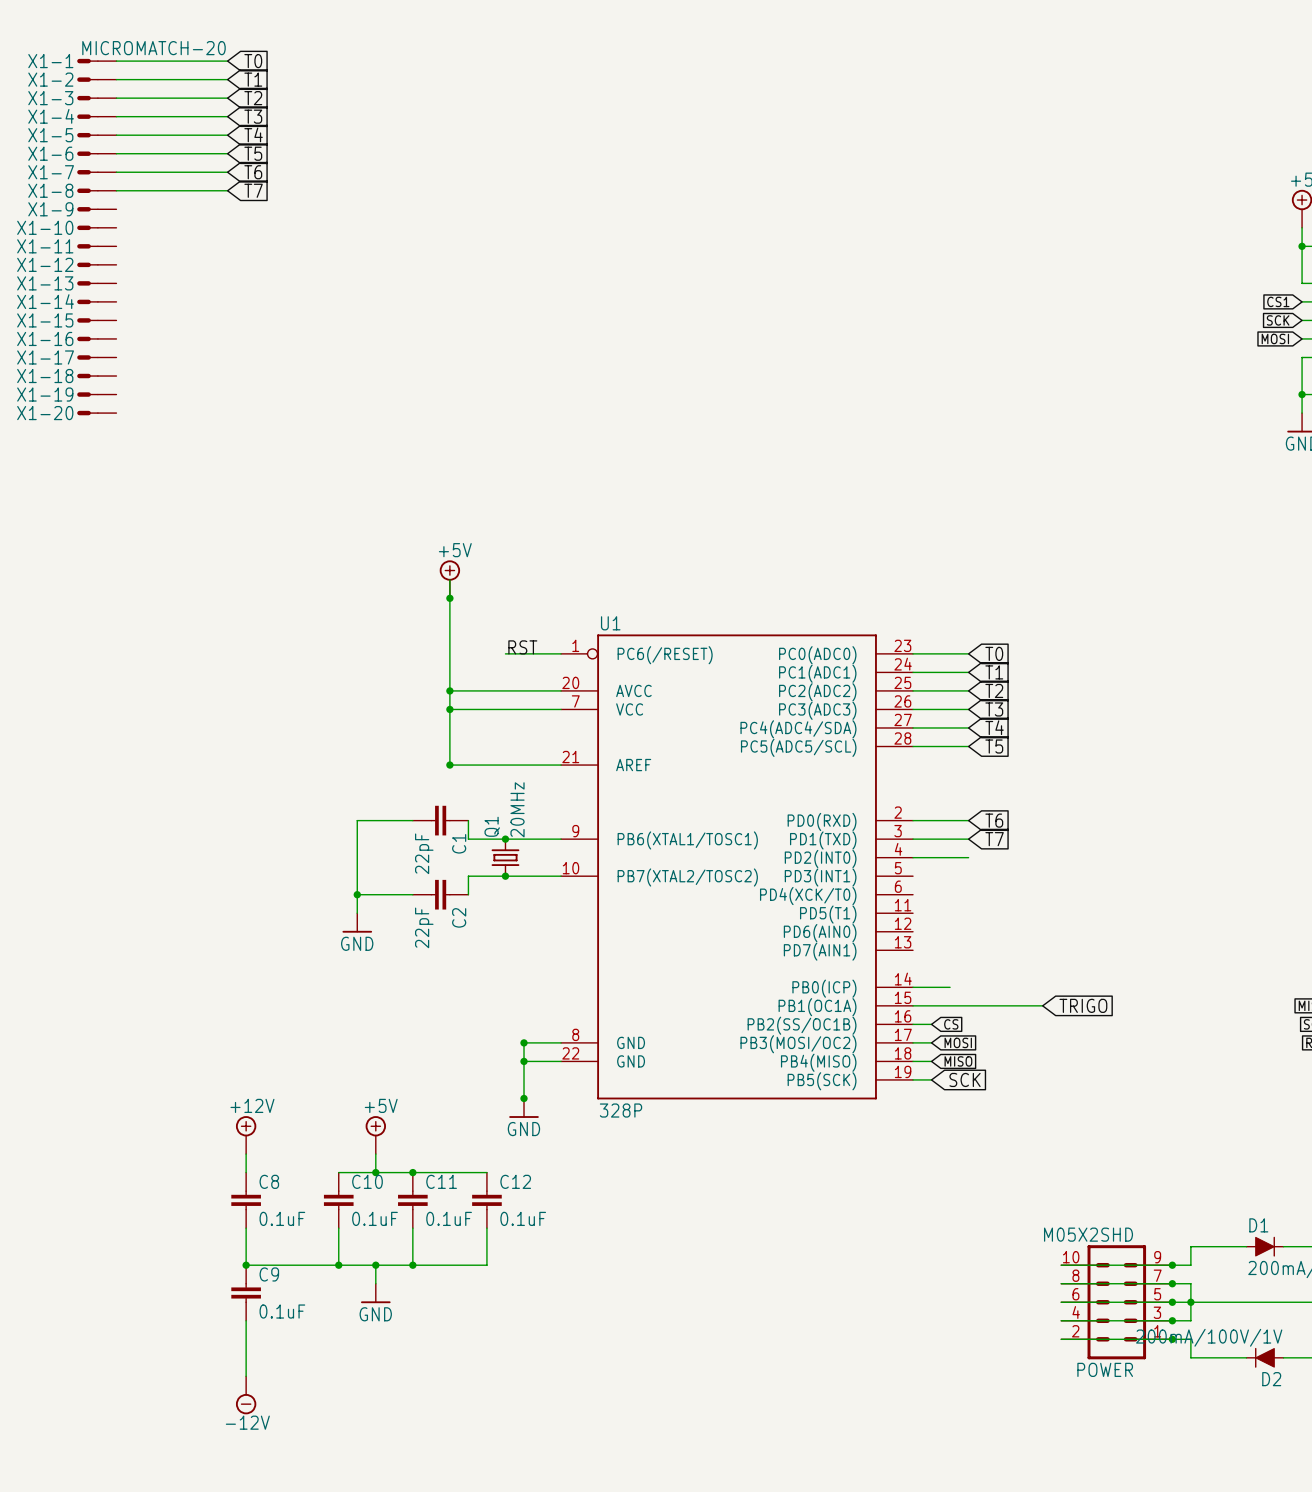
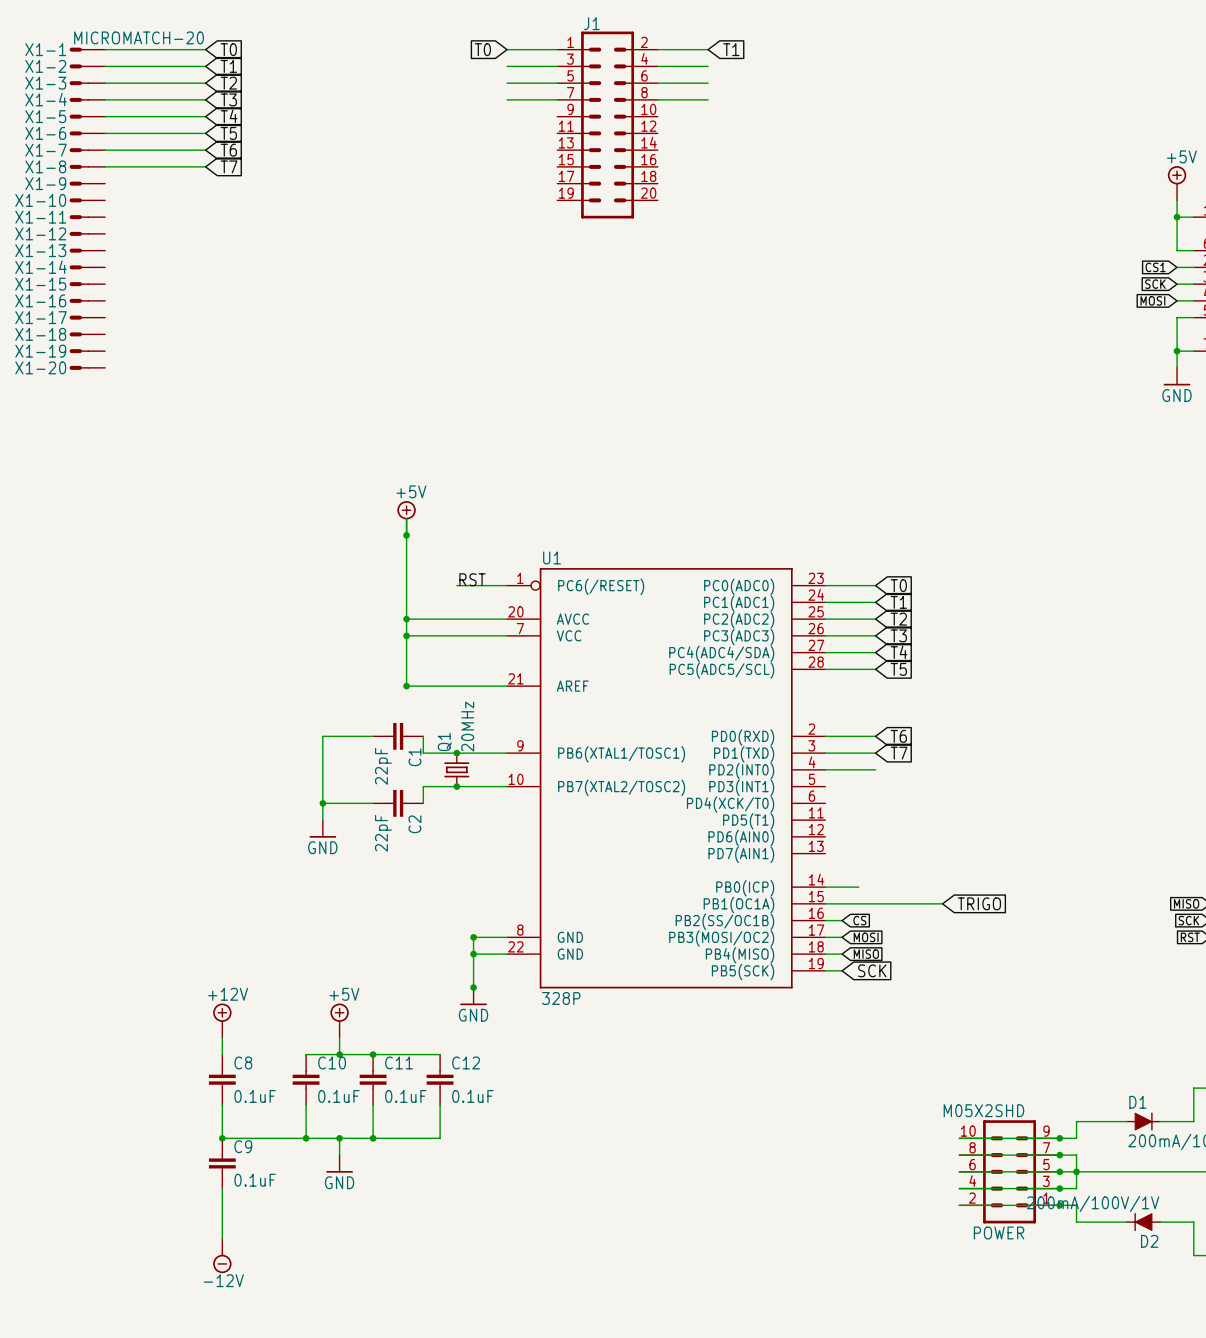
global label: none -> T0 (482, 49)
wire: none -> (507, 49) (557, 49)
wire: none -> (657, 49) (708, 49)
global label: none -> T1 (731, 49)
wire: none -> (507, 66) (557, 66)
wire: none -> (657, 66) (708, 66)
wire: none -> (507, 83) (557, 83)
wire: none -> (657, 83) (708, 83)
wire: none -> (507, 99) (557, 99)
wire: none -> (657, 99) (708, 99)
J1: none -> (607, 125)

